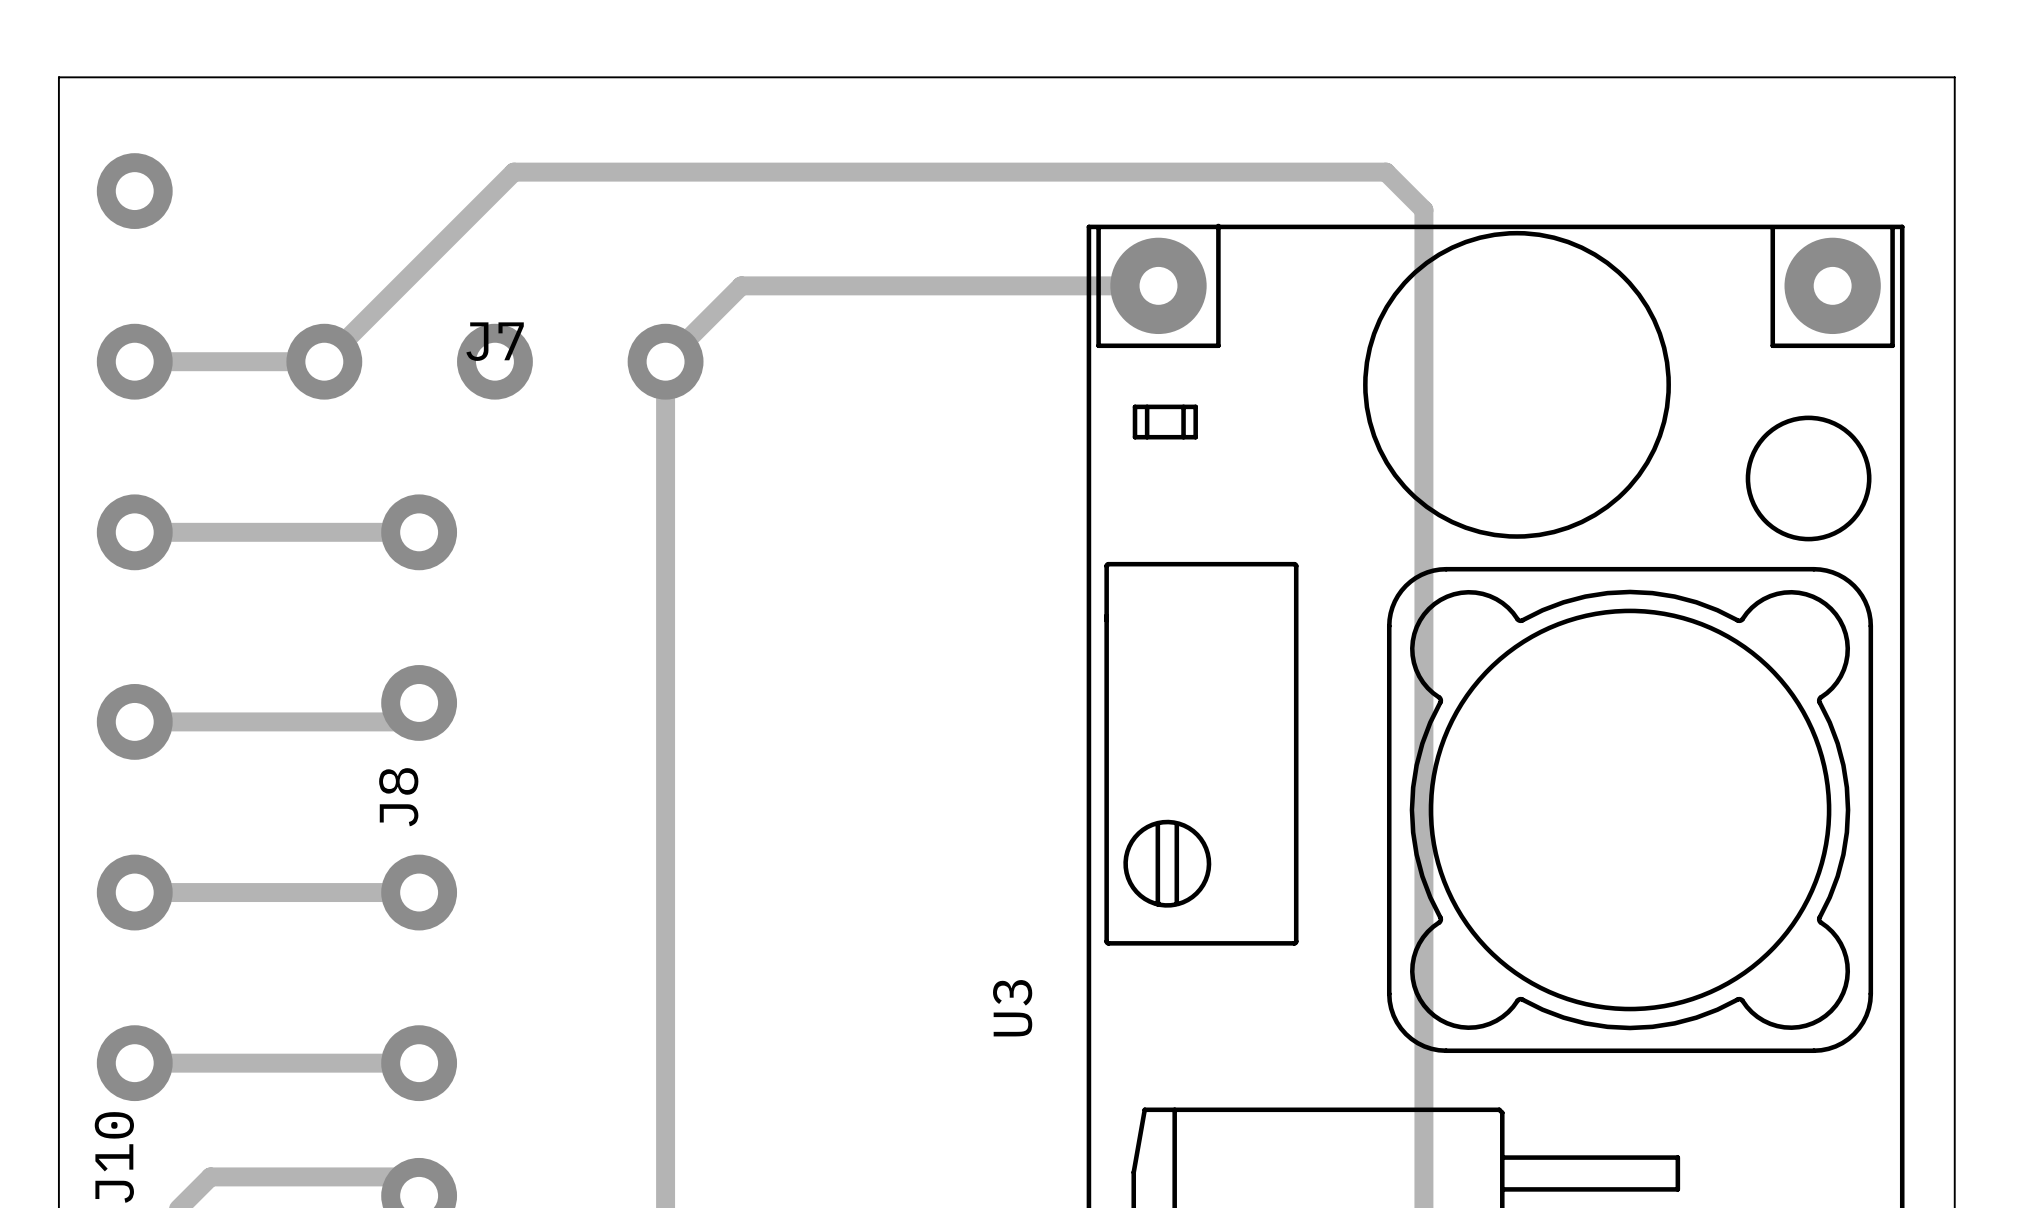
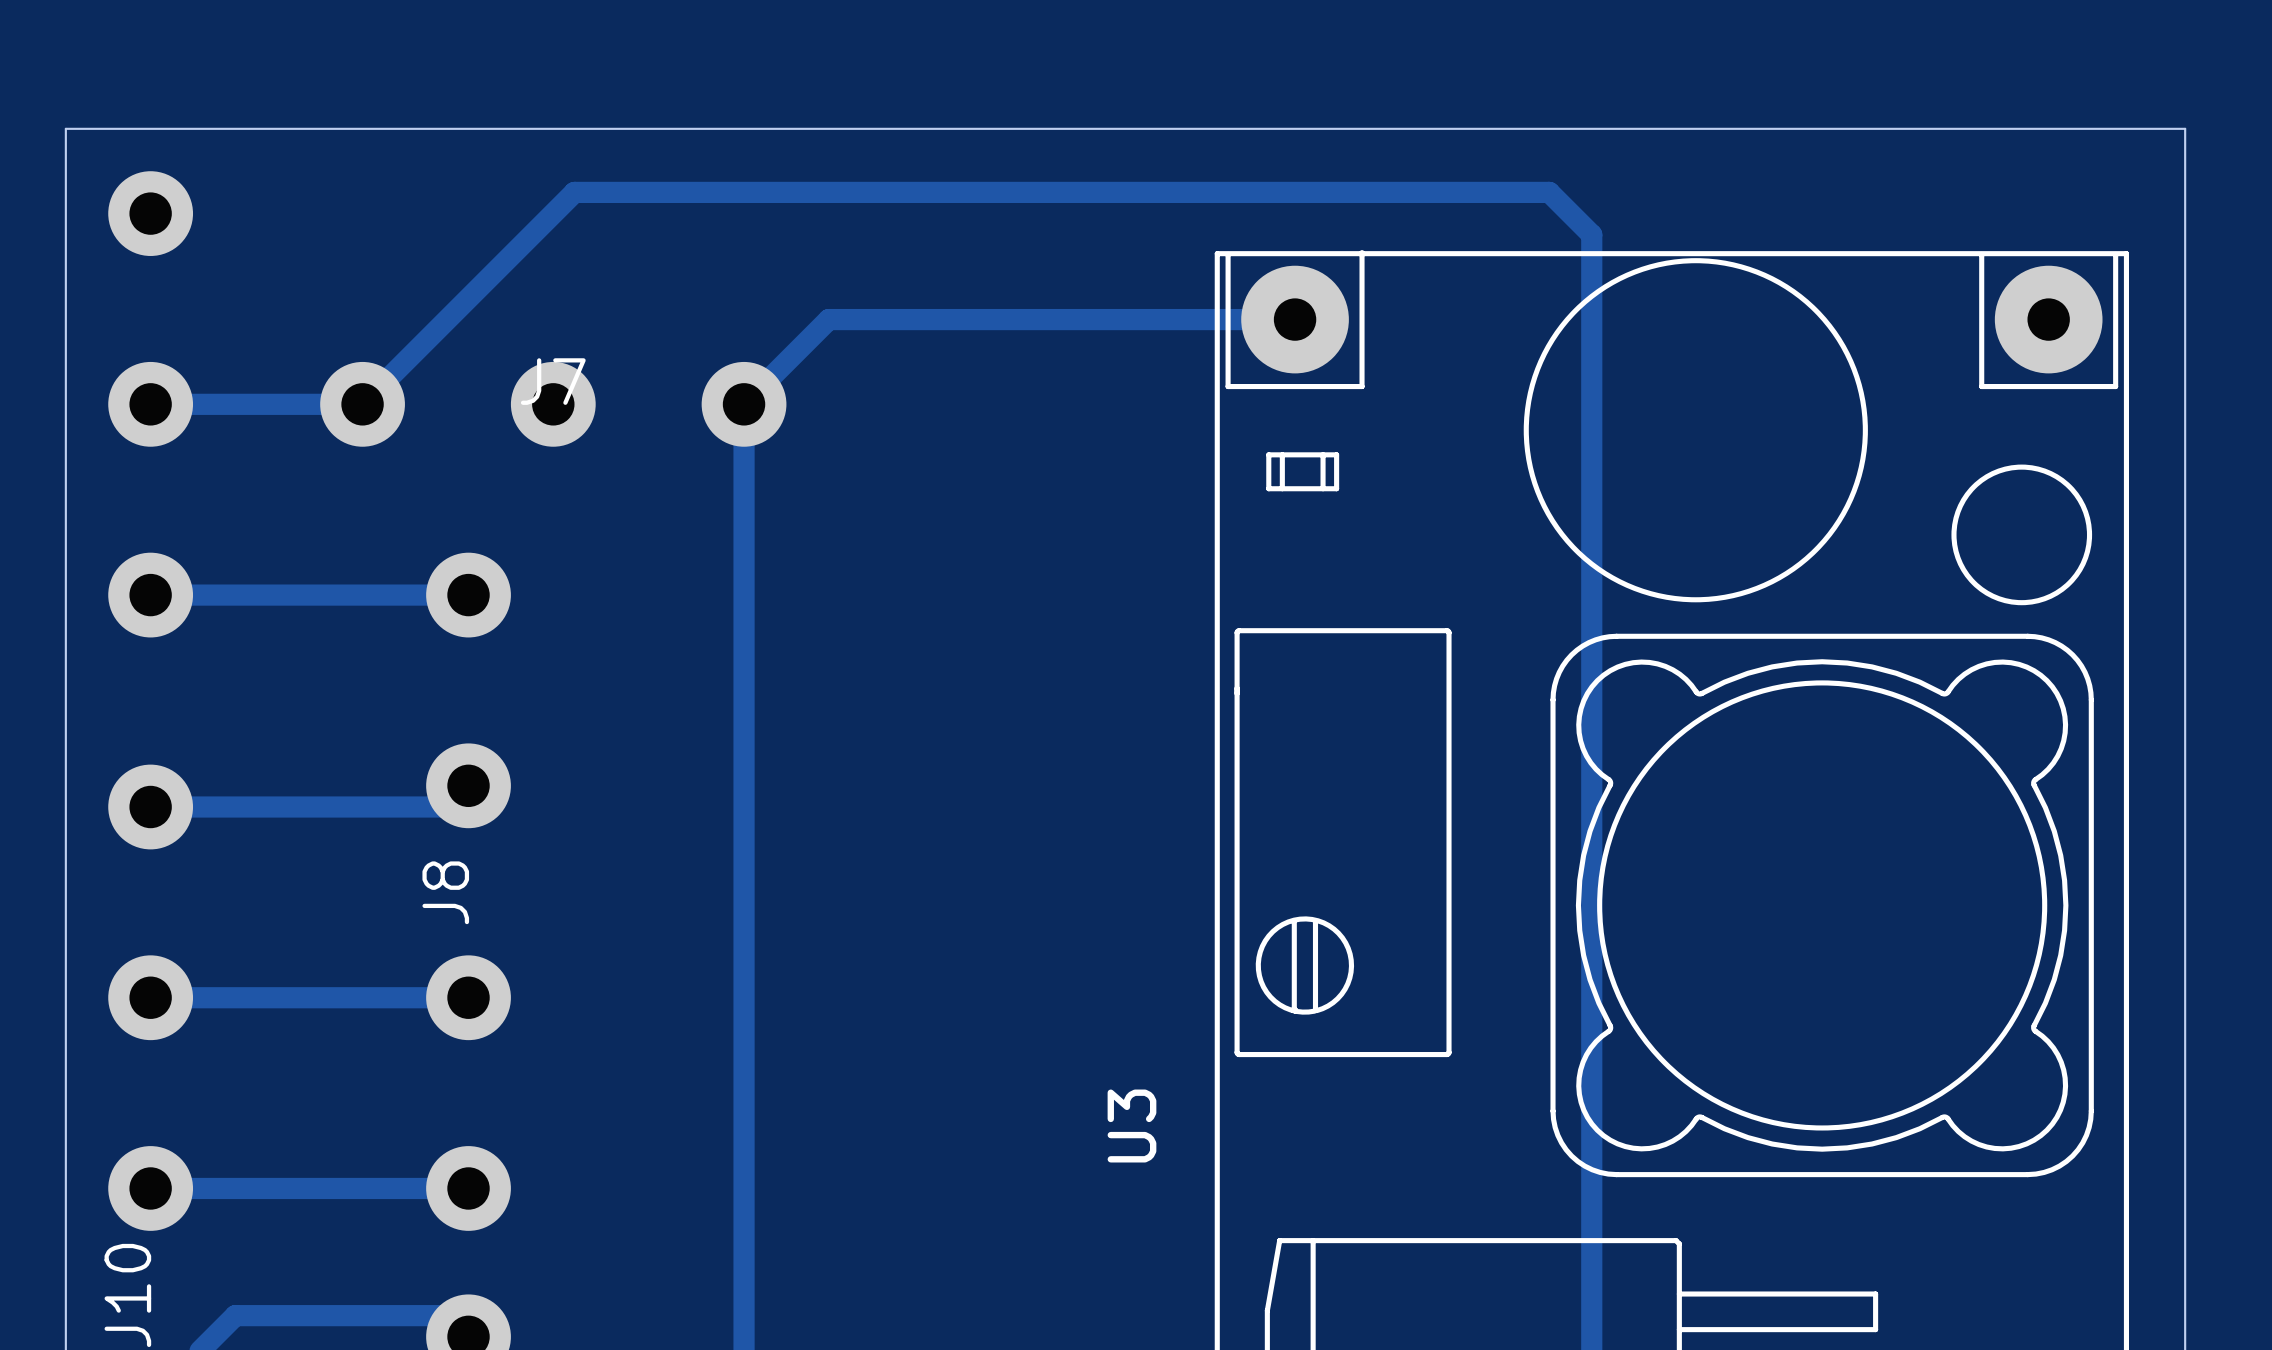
board edge: (58, 115) (58, 77) (1954, 77) (1954, 115) -> (65, 128) (2185, 128)

